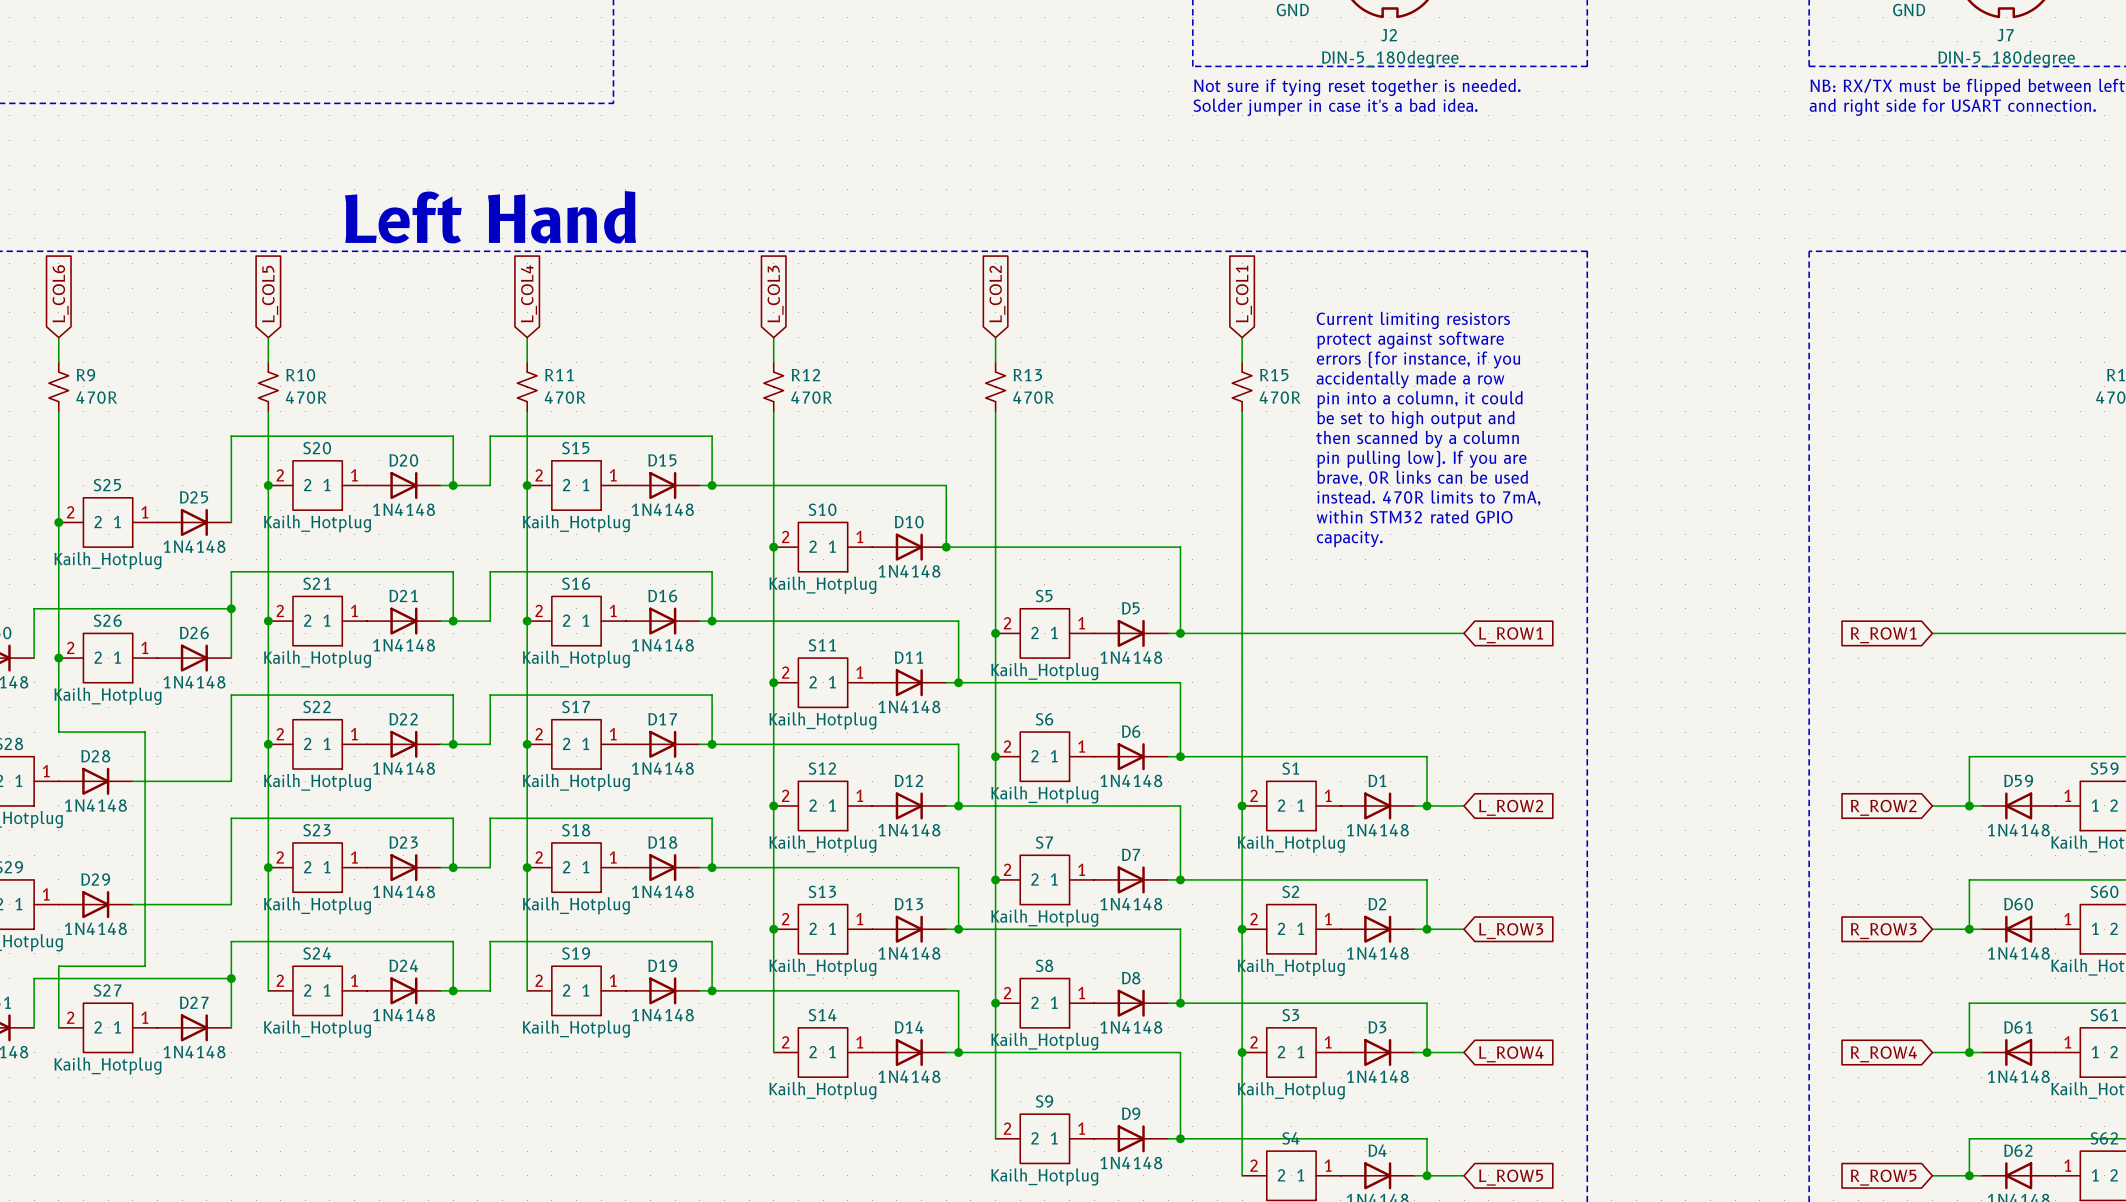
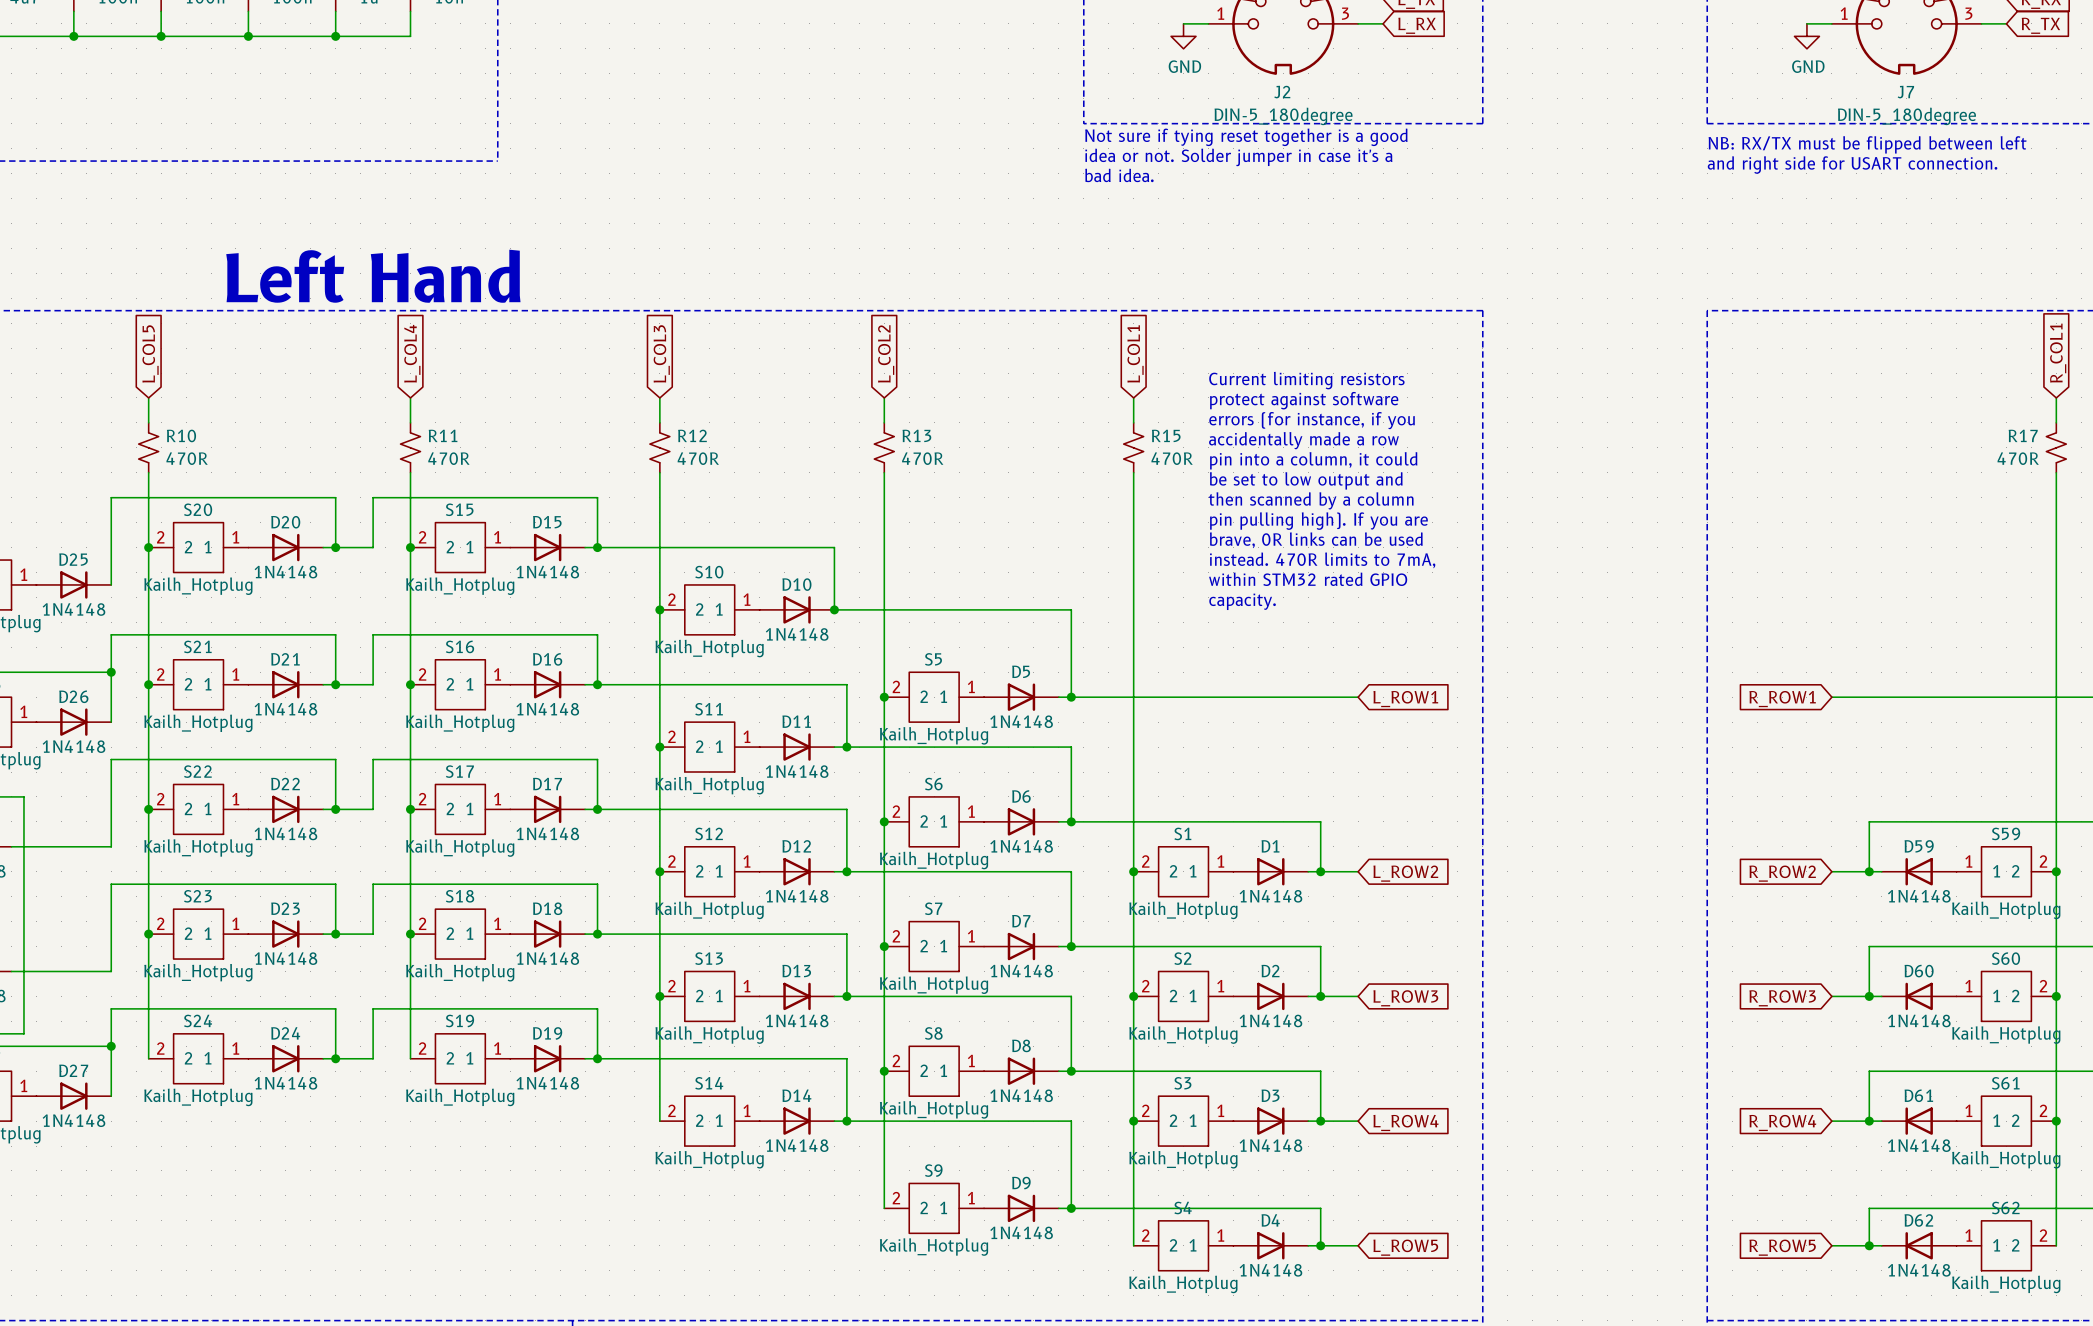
text: Not sure if tying reset together is needed. (1357, 87) -> Not sure if tying reset together is a good (1246, 137)
text: Solder jumper in case it's a bad idea. (1335, 107) -> idea or not. Solder jumper in case it's a (1238, 157)
text: none -> bad idea. (1119, 175)
text: be set to high output and (1416, 419) -> be set to low output and (1306, 480)
text: pin pulling low). If you are (1422, 459) -> pin pulling high). If you are (1318, 521)

